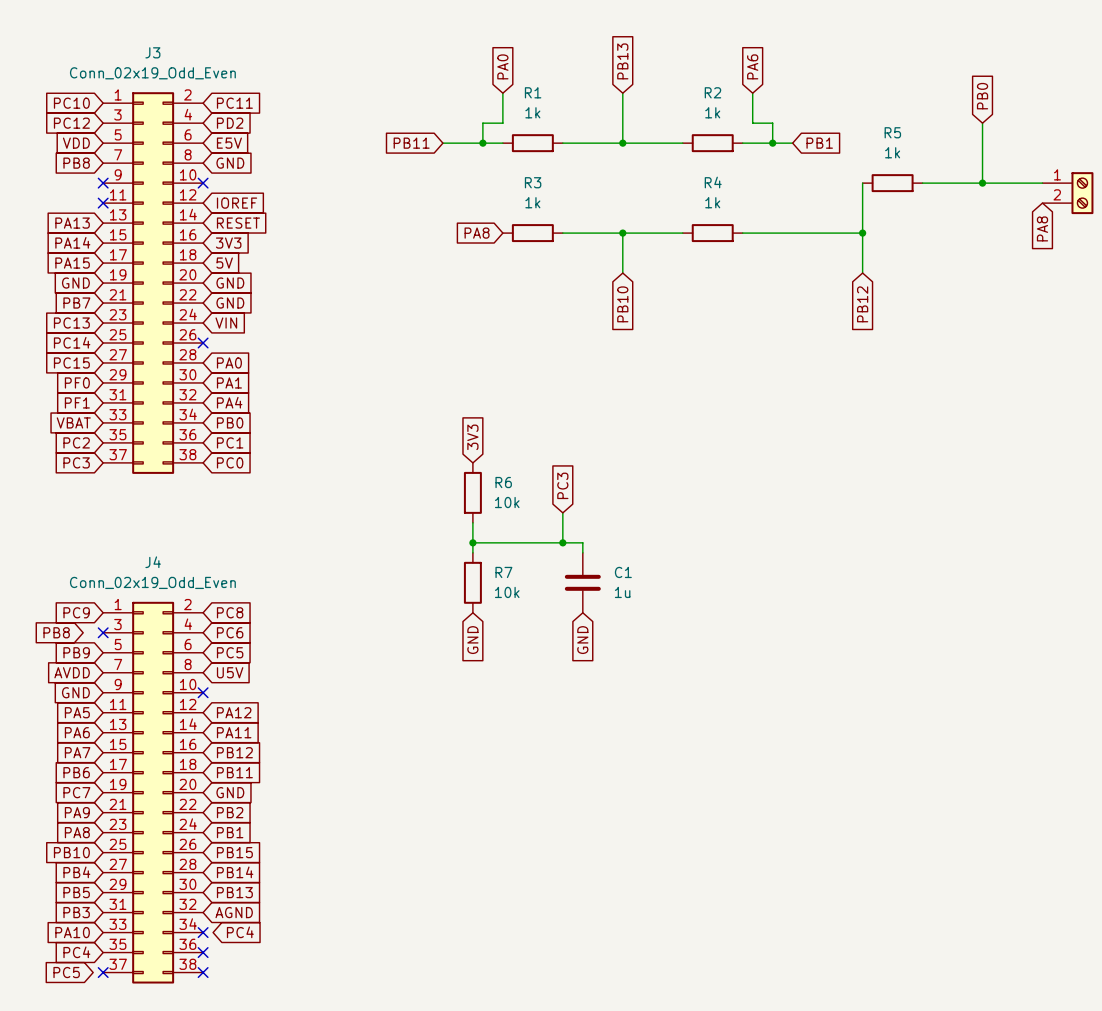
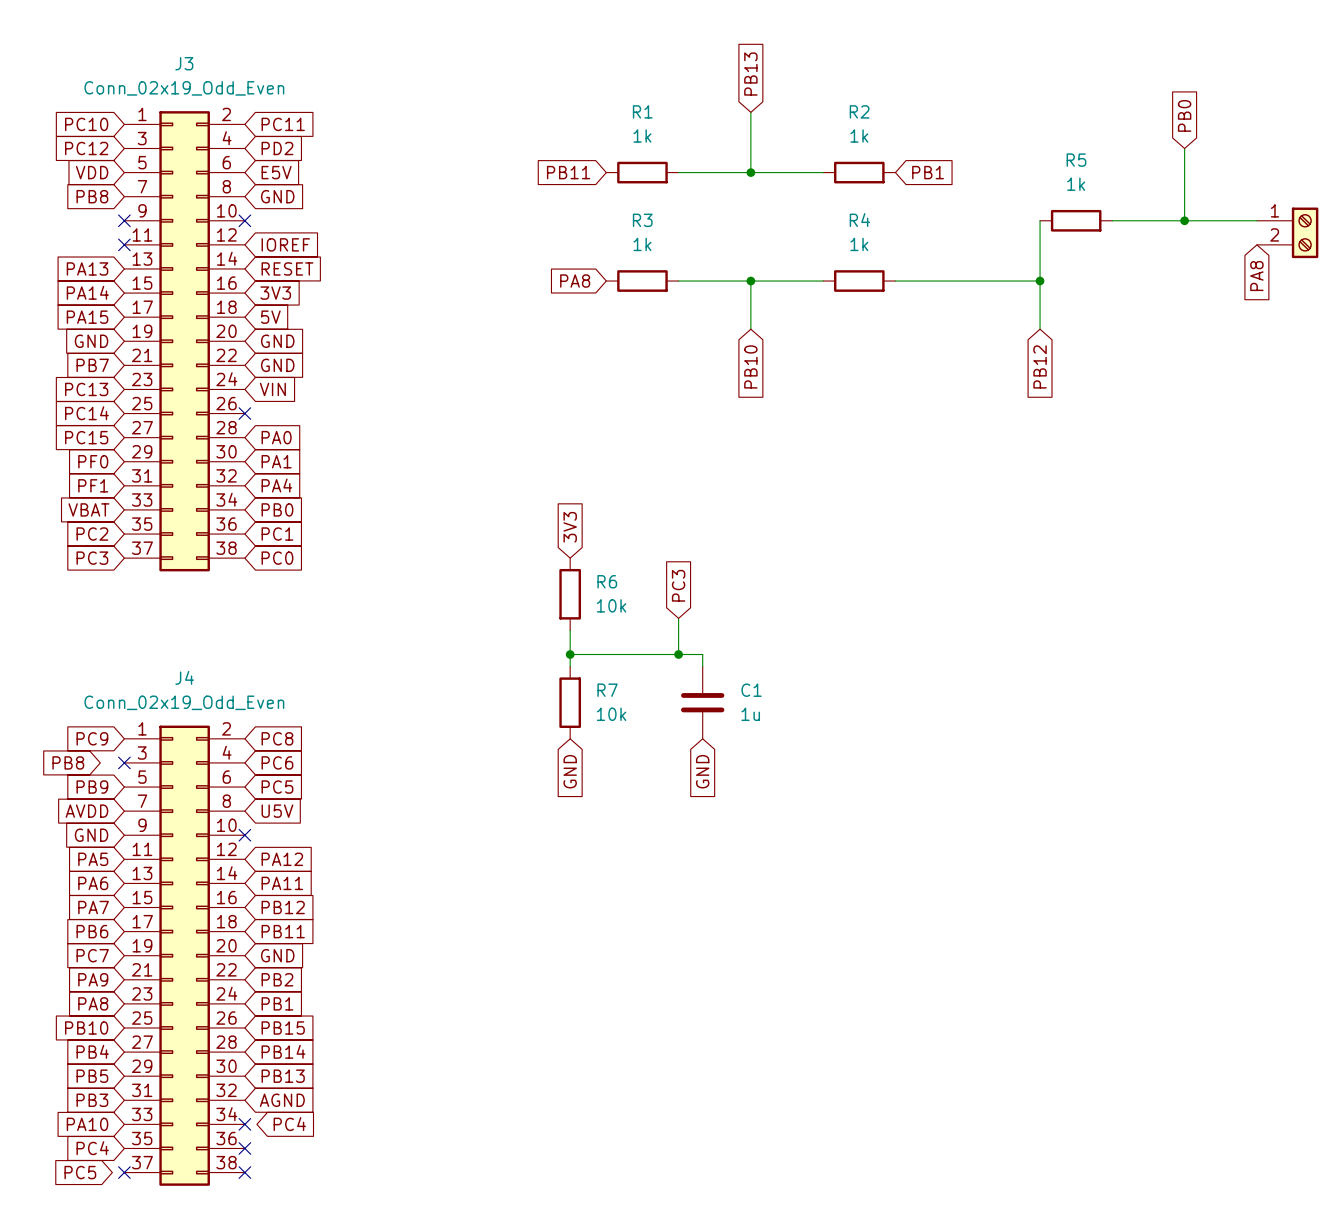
global label: PA0 (502, 66) -> none
global label: PA6 (752, 66) -> none
wire: (502, 93) (502, 123) (482, 123) (482, 143) -> none
wire: (752, 93) (752, 123) (772, 123) (772, 143) -> none
global label position: PB11 (411, 143) -> PB11 (568, 172)
wire: (442, 143) (502, 143) -> none
junction: (482, 143) -> none
wire: (742, 143) (792, 143) -> none
junction: (772, 143) -> none
global label position: PB1 (819, 143) -> PB1 (928, 172)

